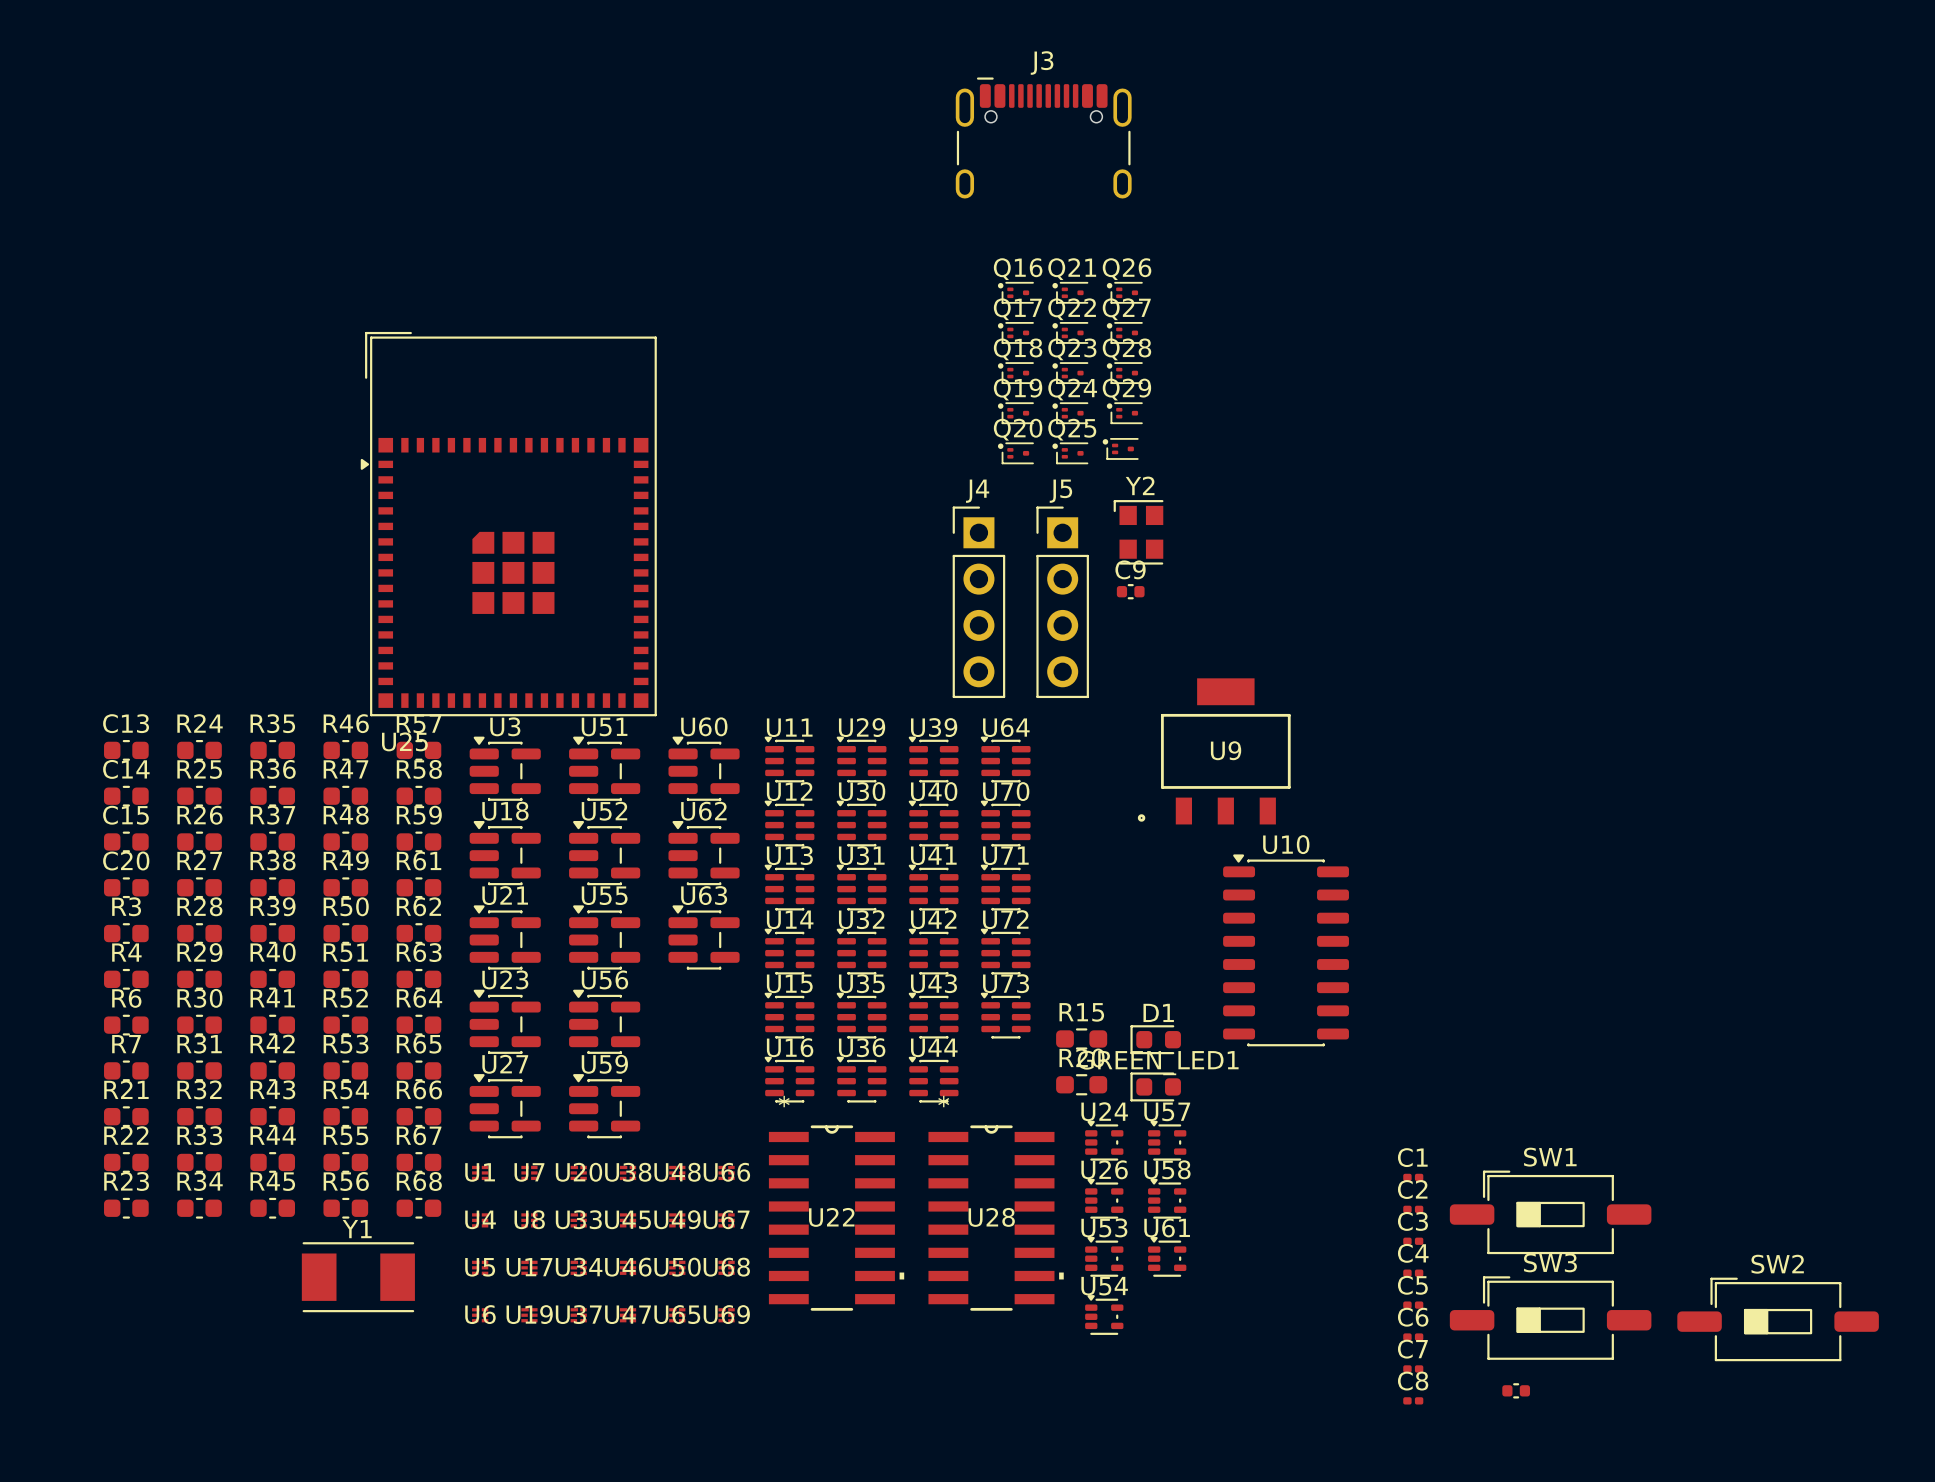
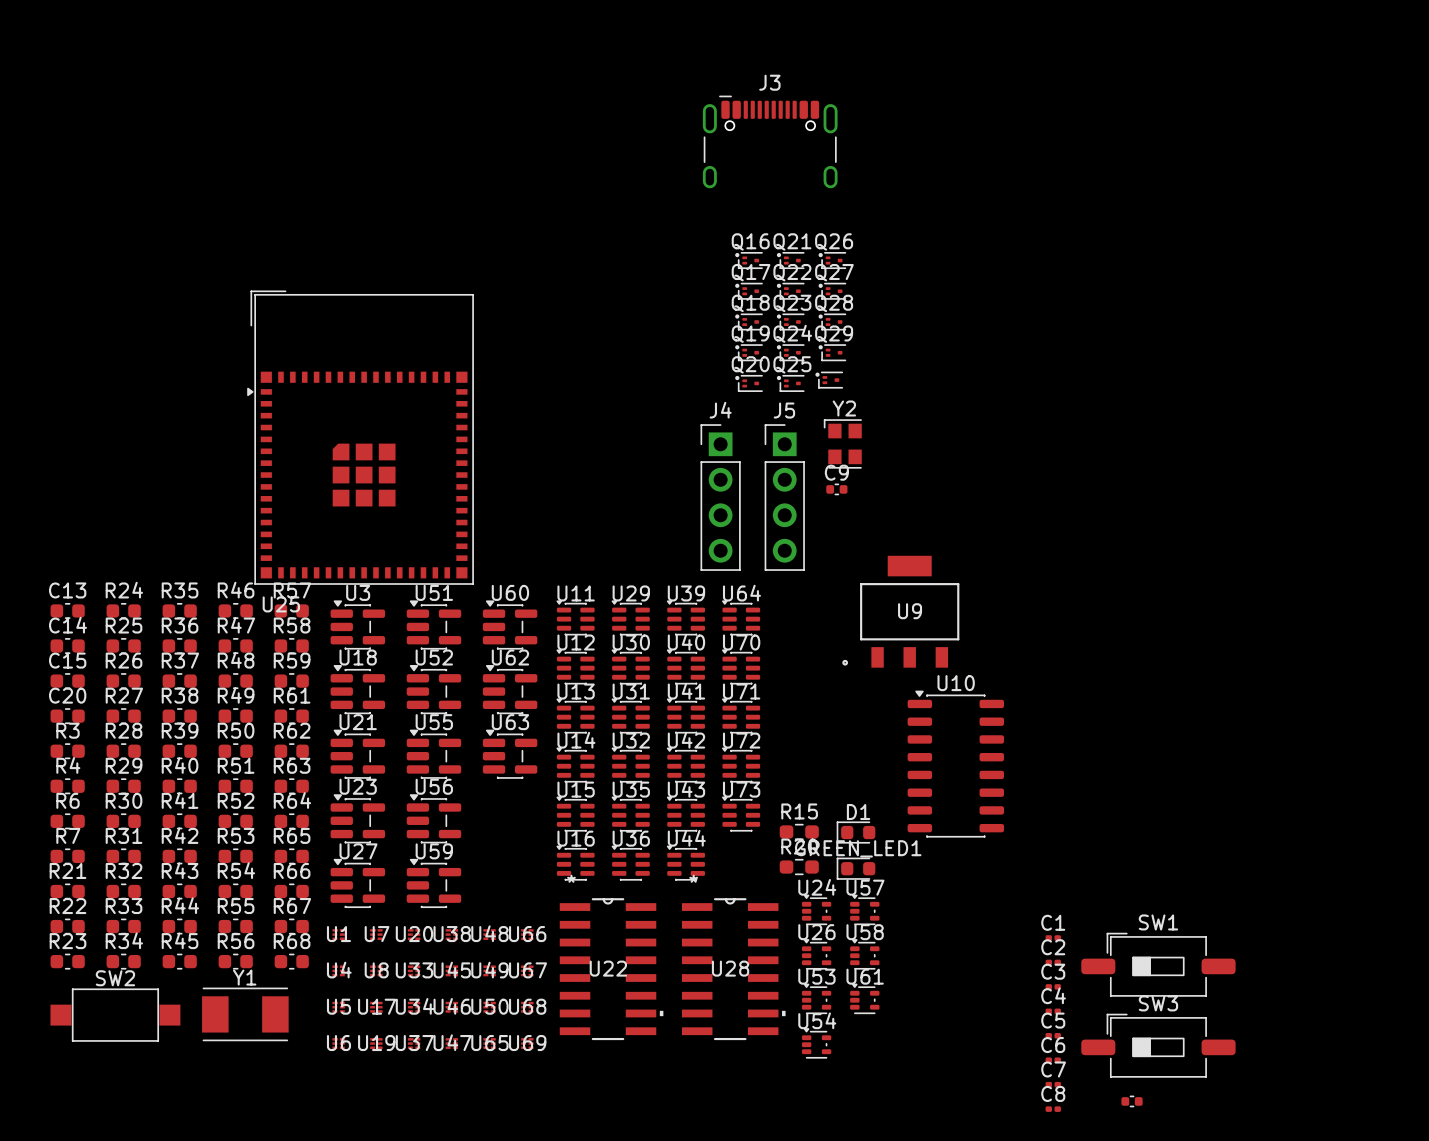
SW2 footprint: [1677, 1277, 1879, 1362] -> [50, 988, 181, 1042]

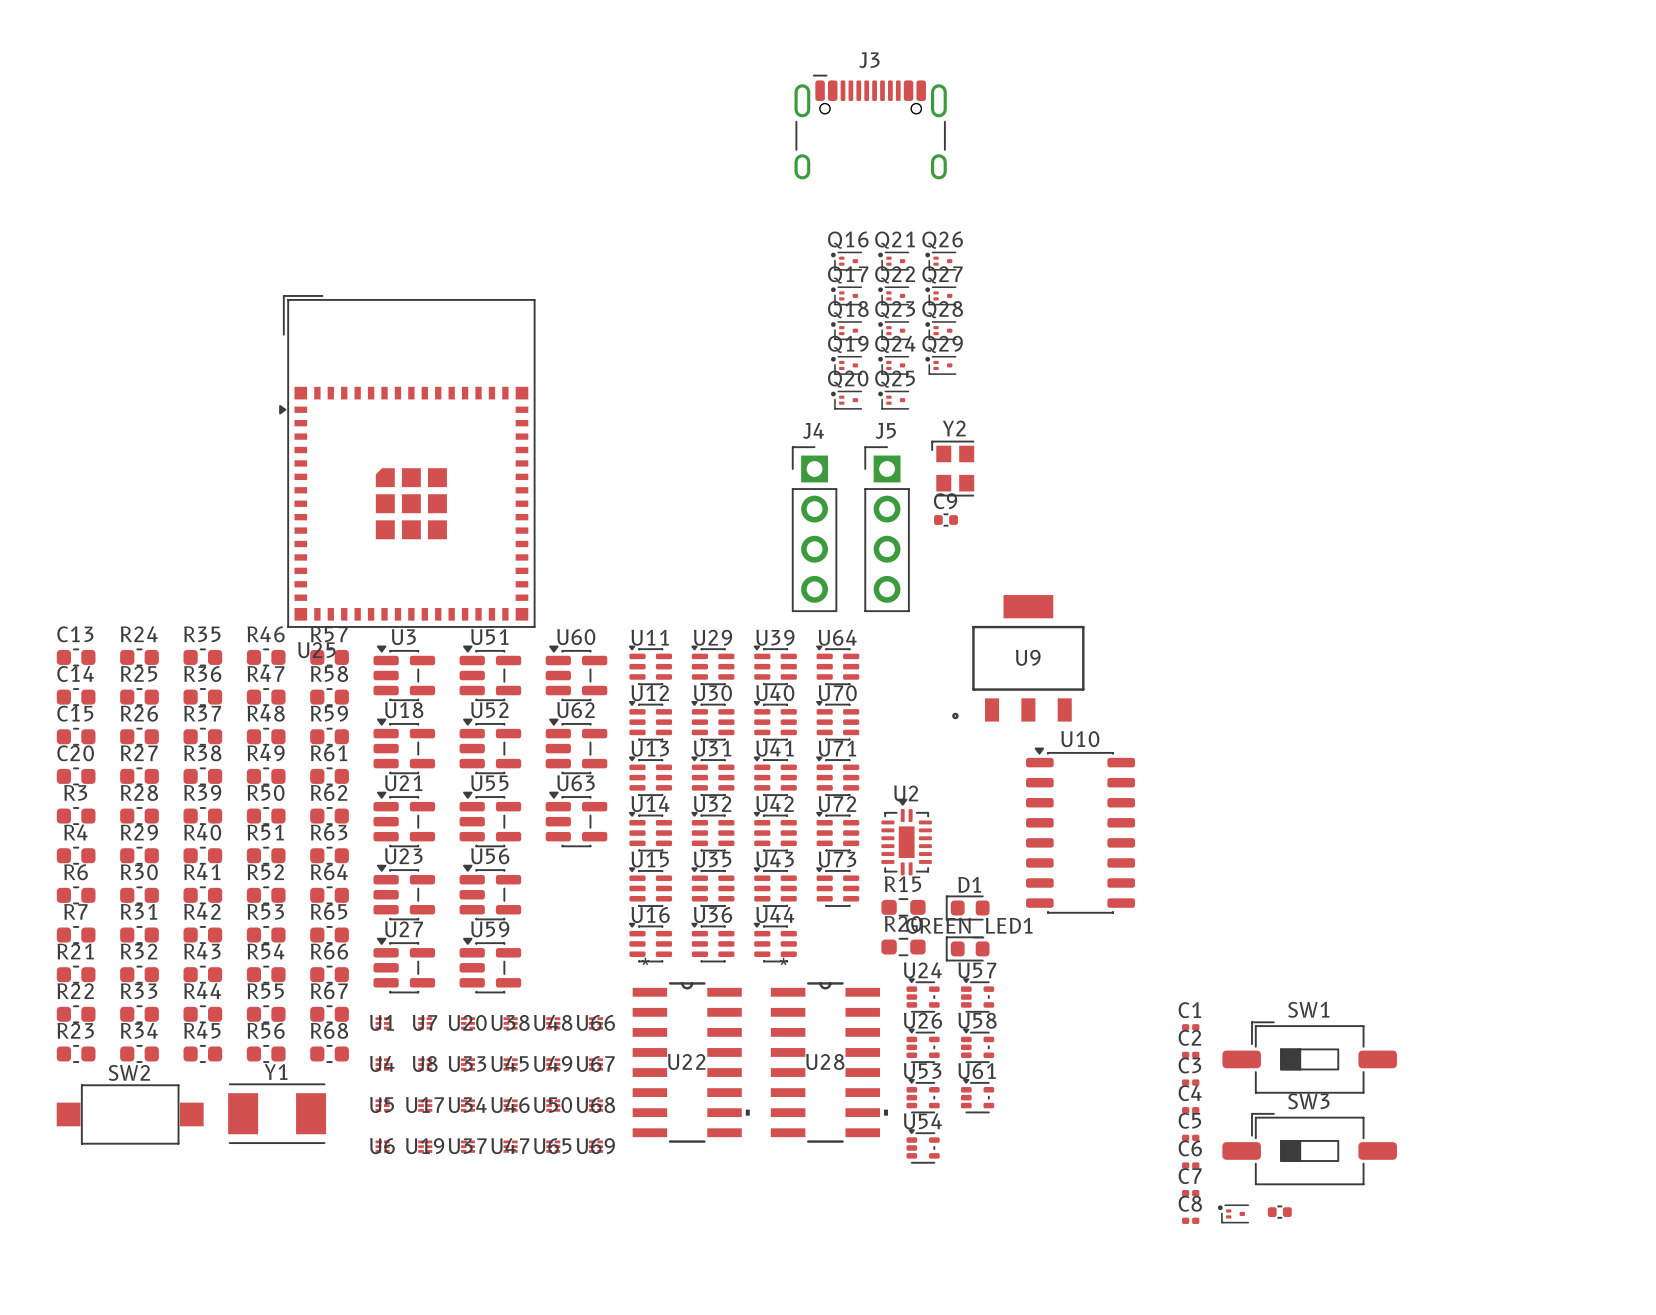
part: (829, 380) -> none
U2: none -> (906, 836)
part: none -> (1233, 1213)

